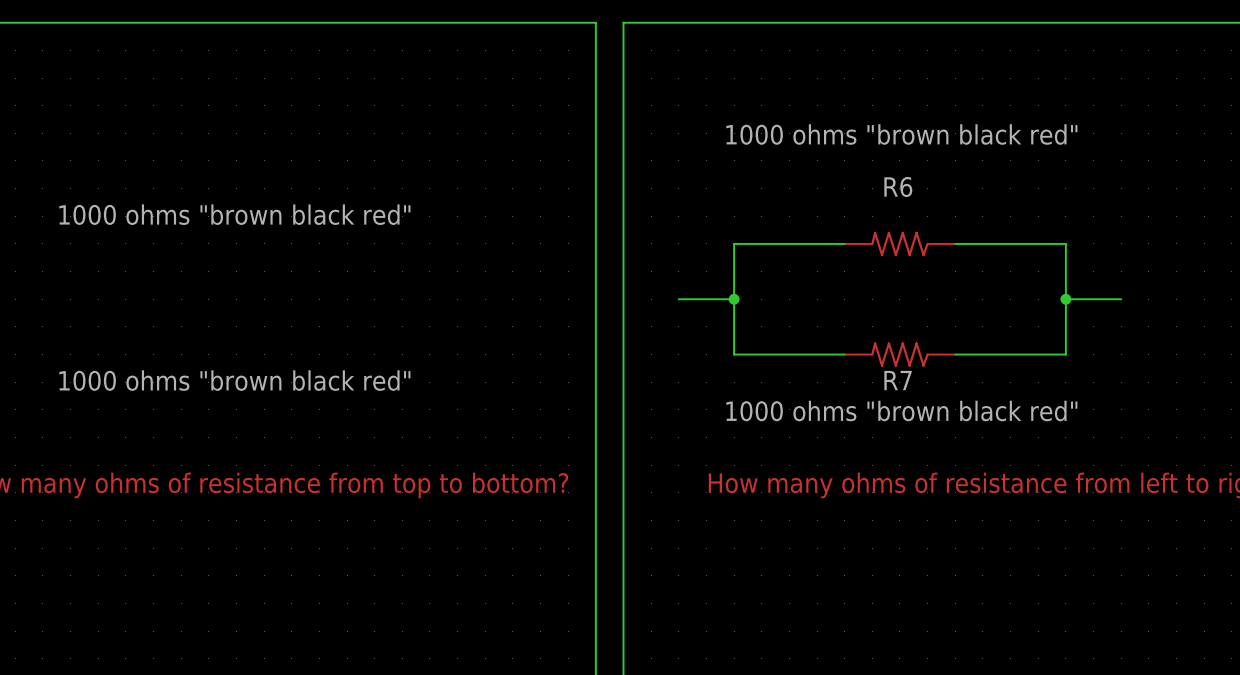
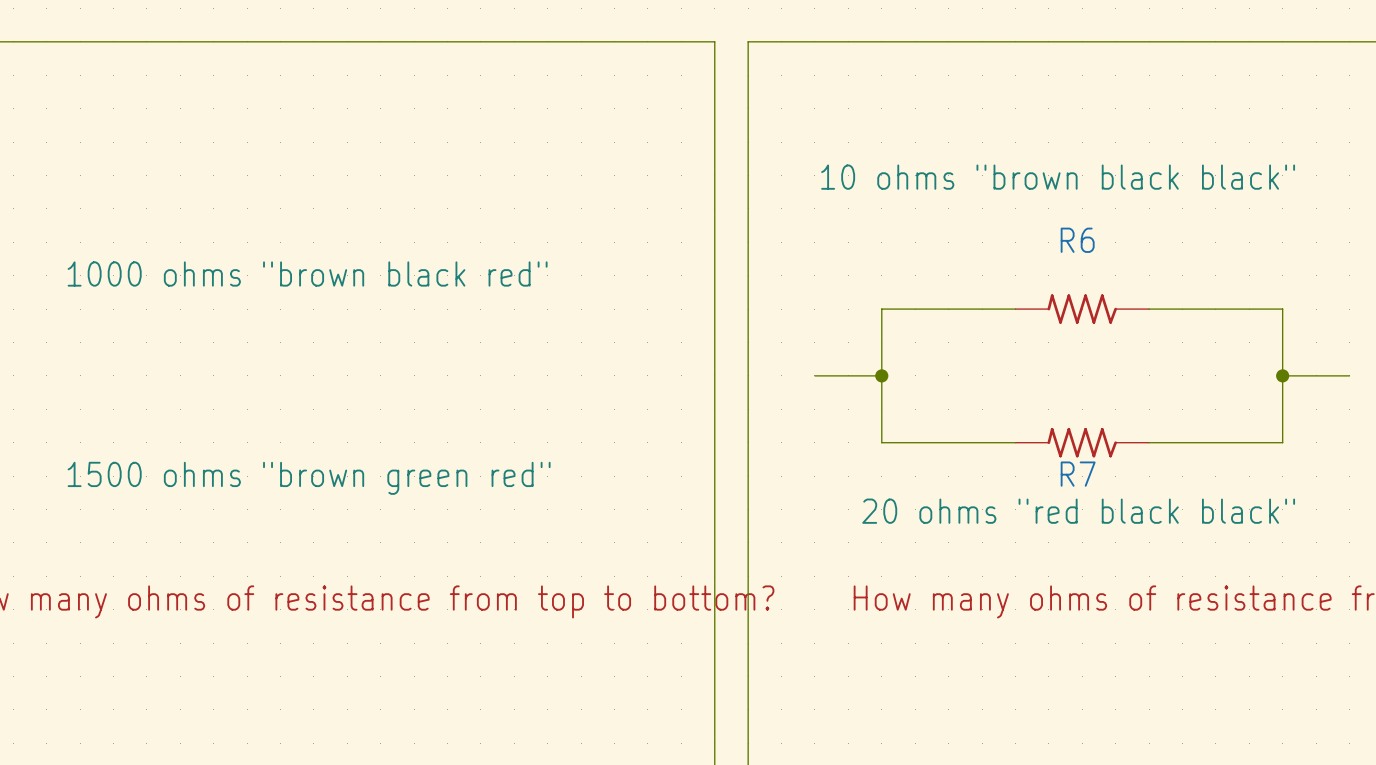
R6 value: 1000 ohms "brown black red" (901, 134) -> 10 ohms "brown black black" (1058, 177)
part value: 1000 ohms "brown black red" (234, 380) -> 1500 ohms "brown green red" (309, 478)
R7 value: 1000 ohms "brown black red" (901, 411) -> 20 ohms "red black black" (1078, 511)

